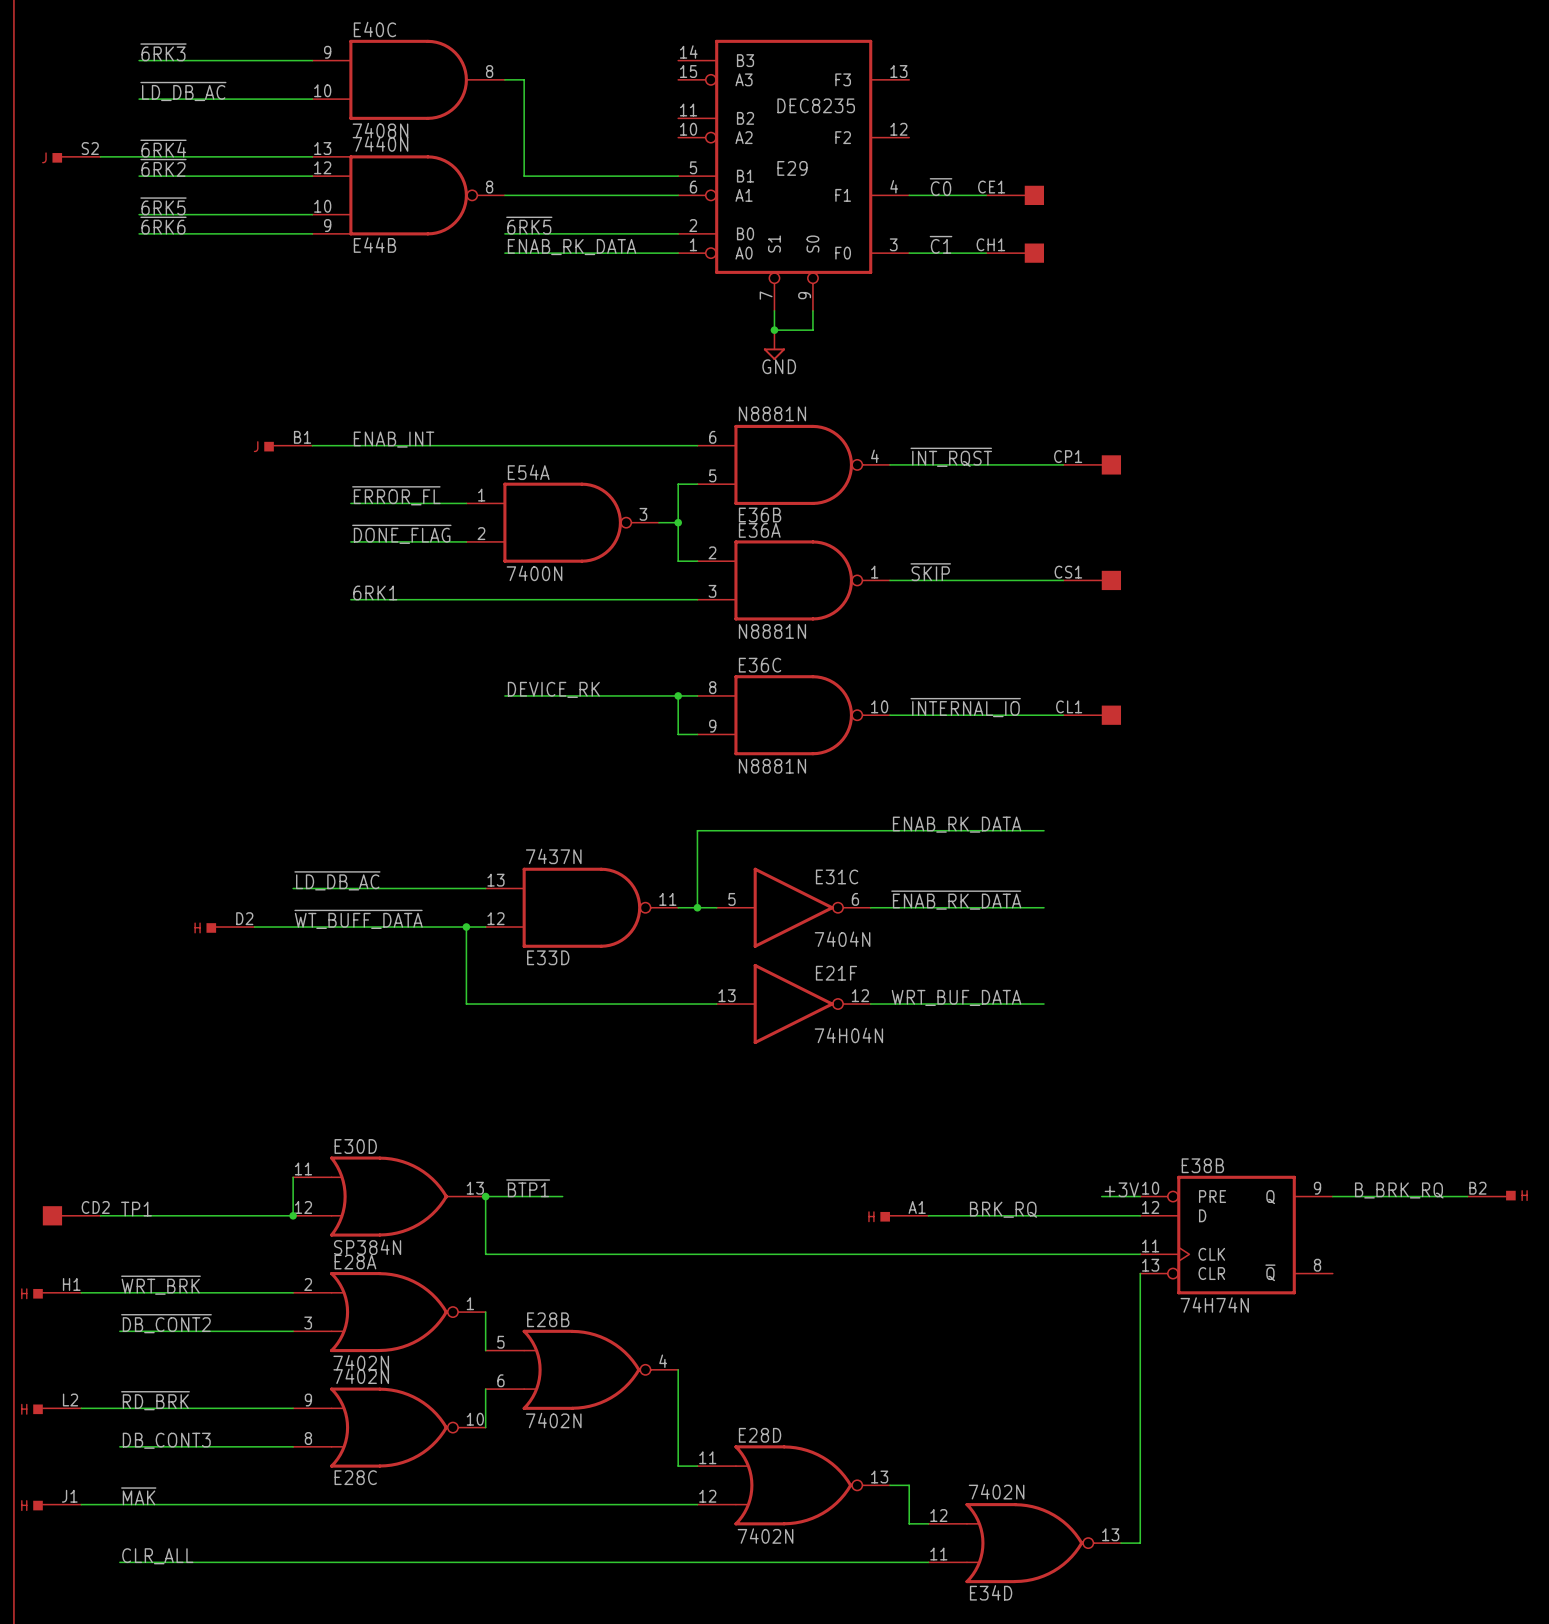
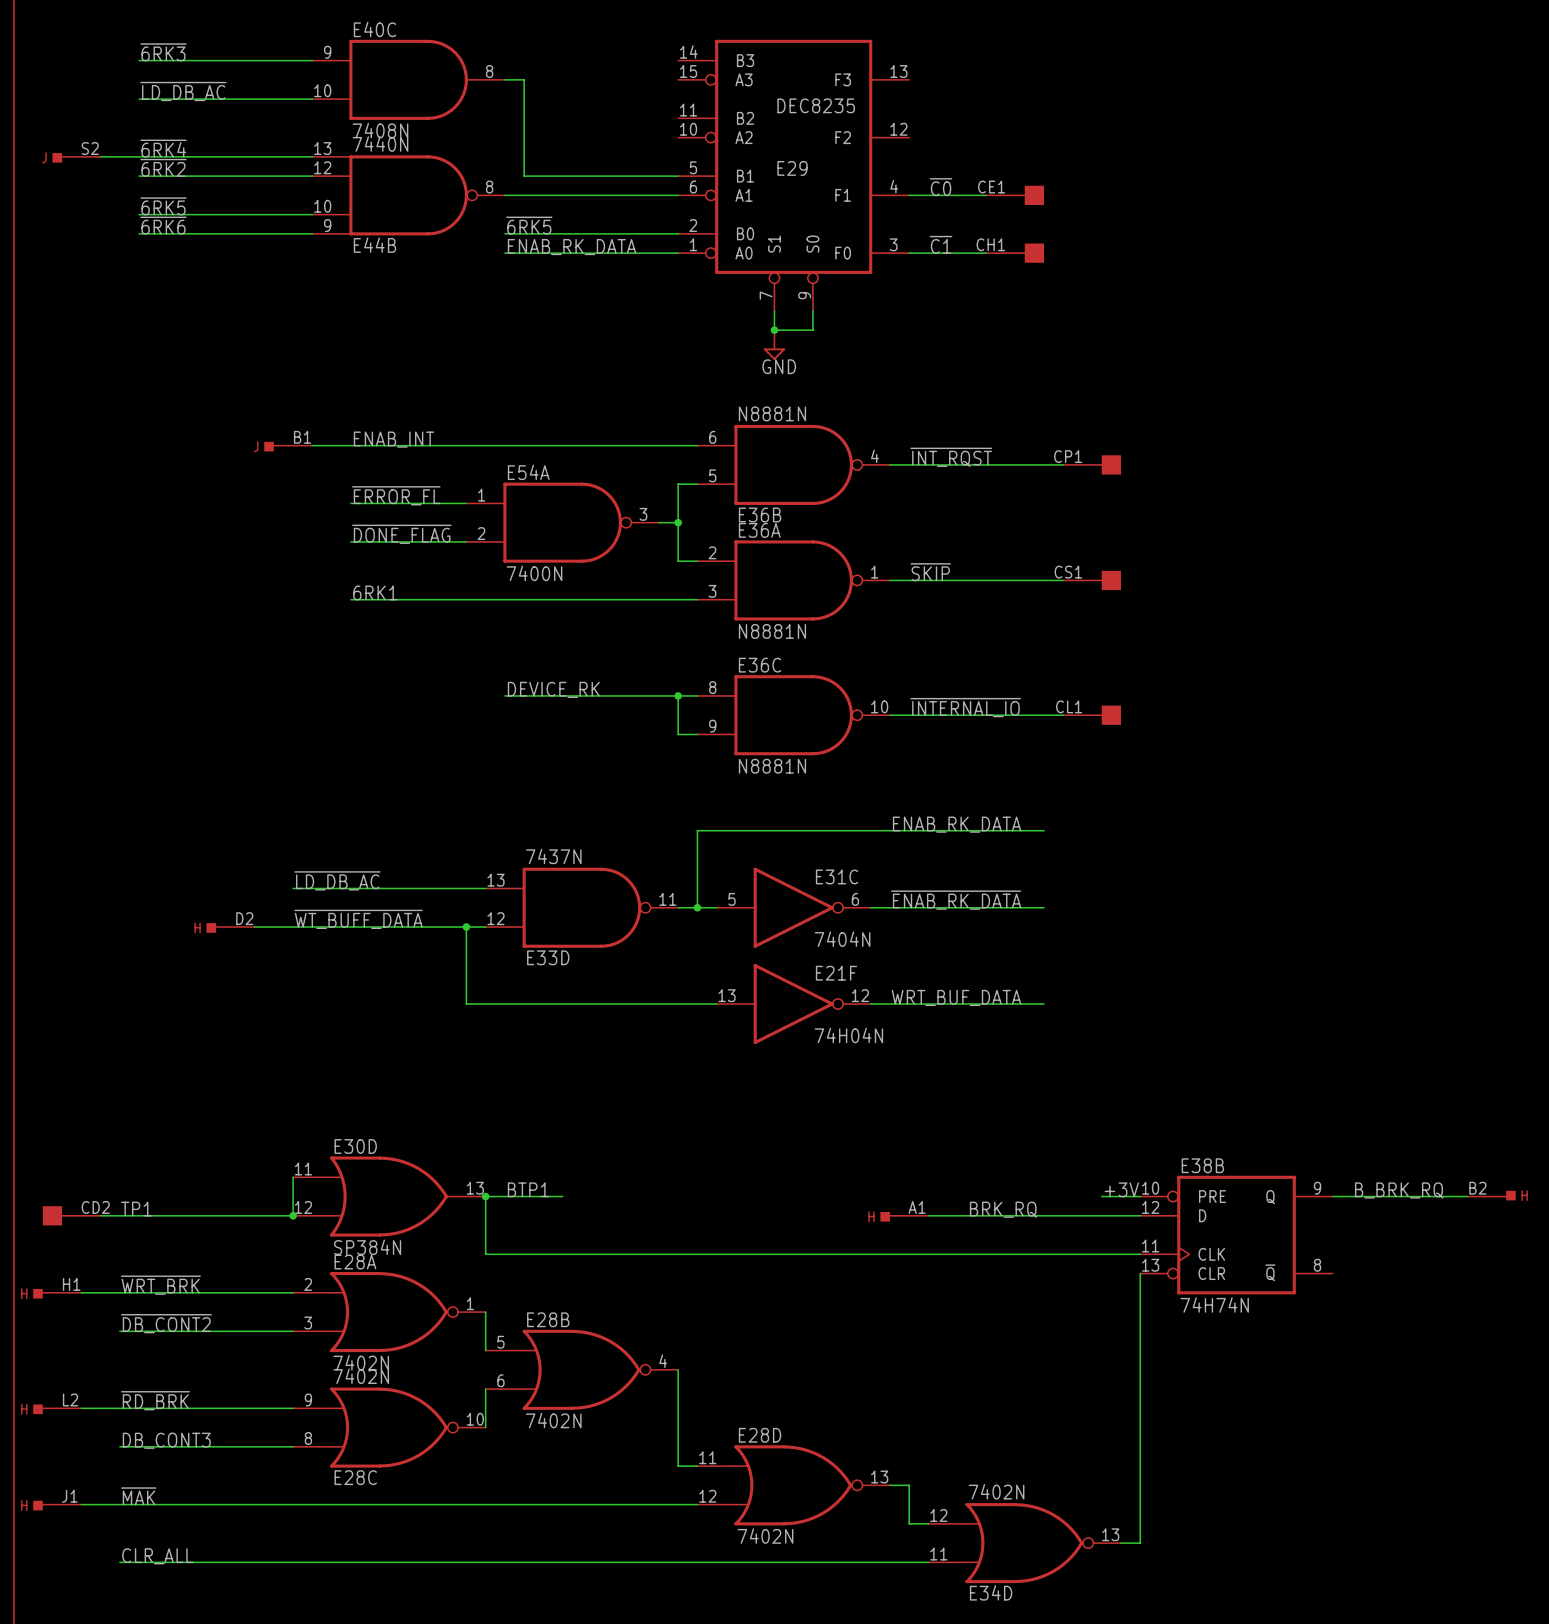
label: ~{BTP1} (528, 1188) -> BTP1 (528, 1189)

